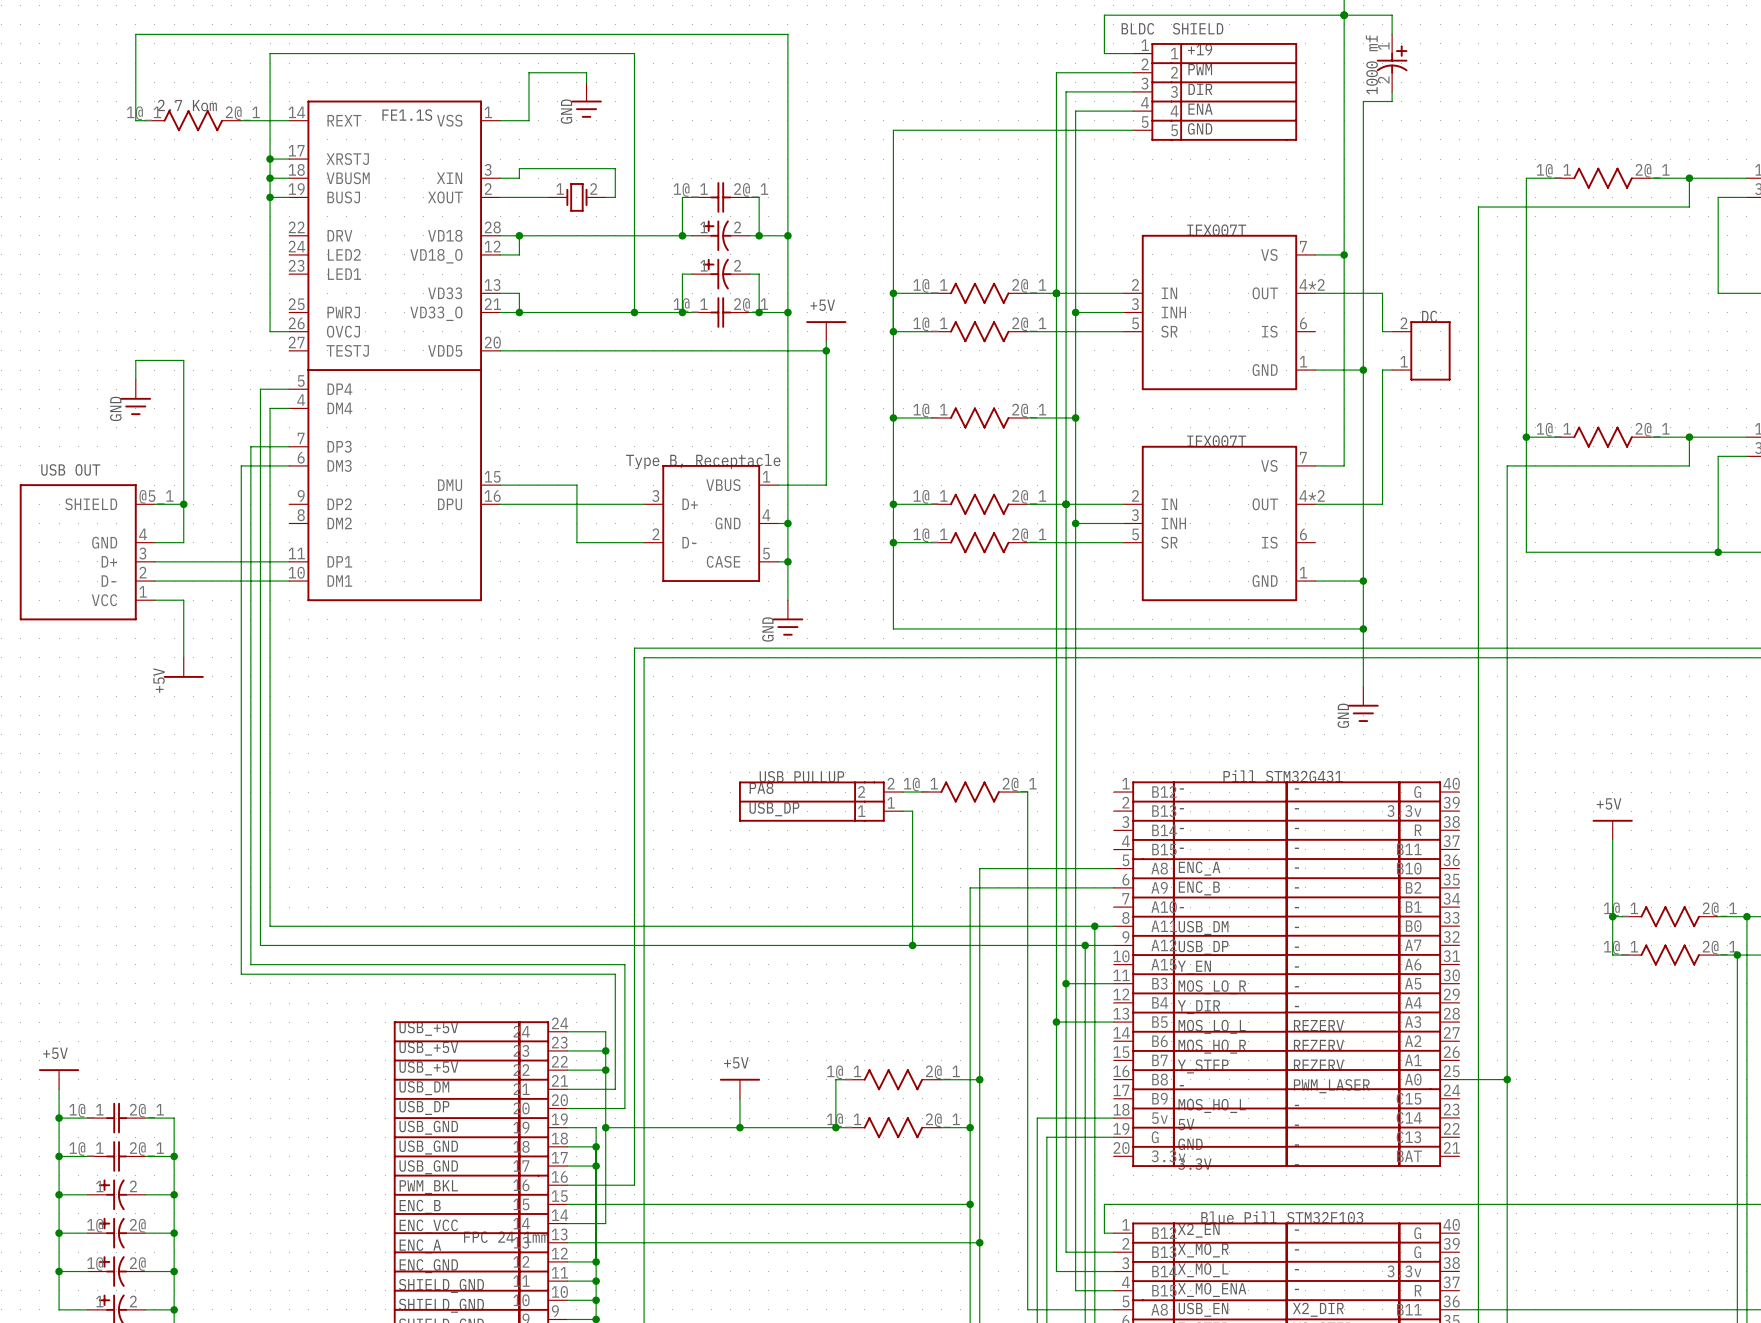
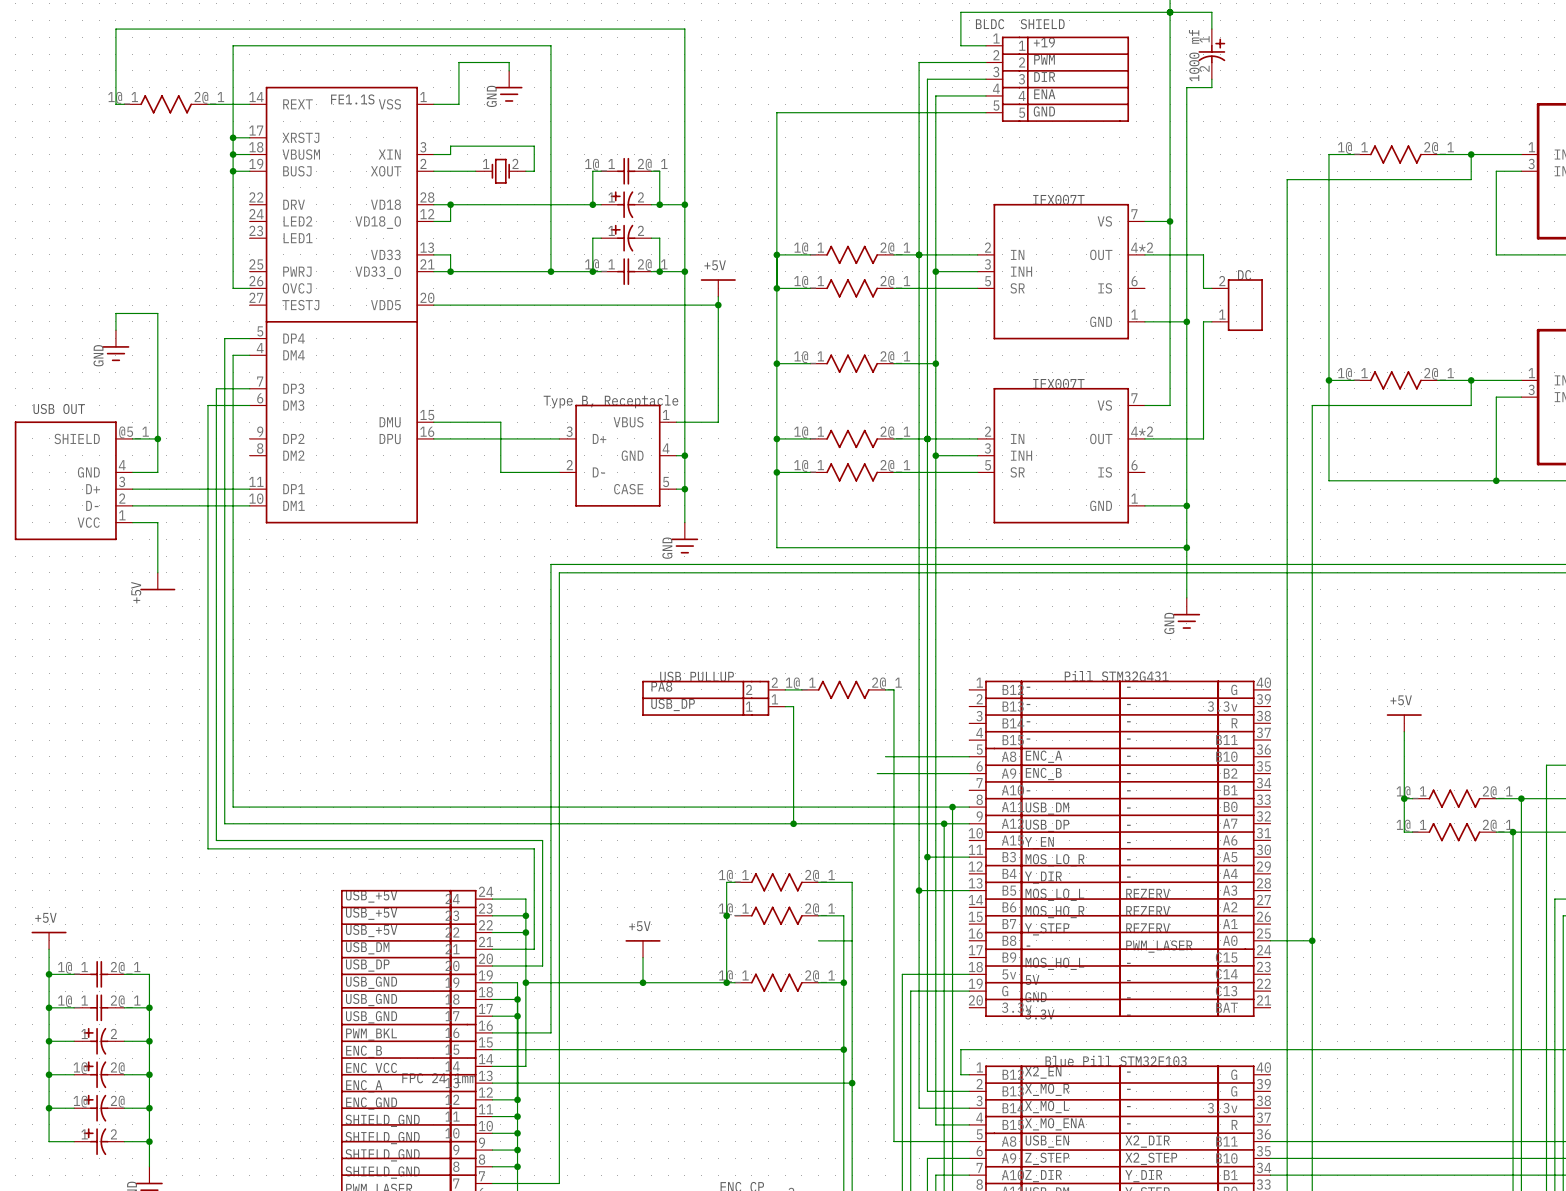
text: 2.7 Kom (187, 105) -> none
wire: (1018, 868) (979, 868) (979, 1012) -> (818, 882) (852, 882)
wire: (1008, 887) (970, 887) (970, 1050) -> (818, 915) (843, 915)
part: none -> (776, 882)
junction: none -> (726, 915)
wire: (835, 1079) (845, 1079) -> (726, 940) (726, 882) (735, 882)
part position: (893, 1079) -> (776, 915)
junction: (979, 1079) -> none

